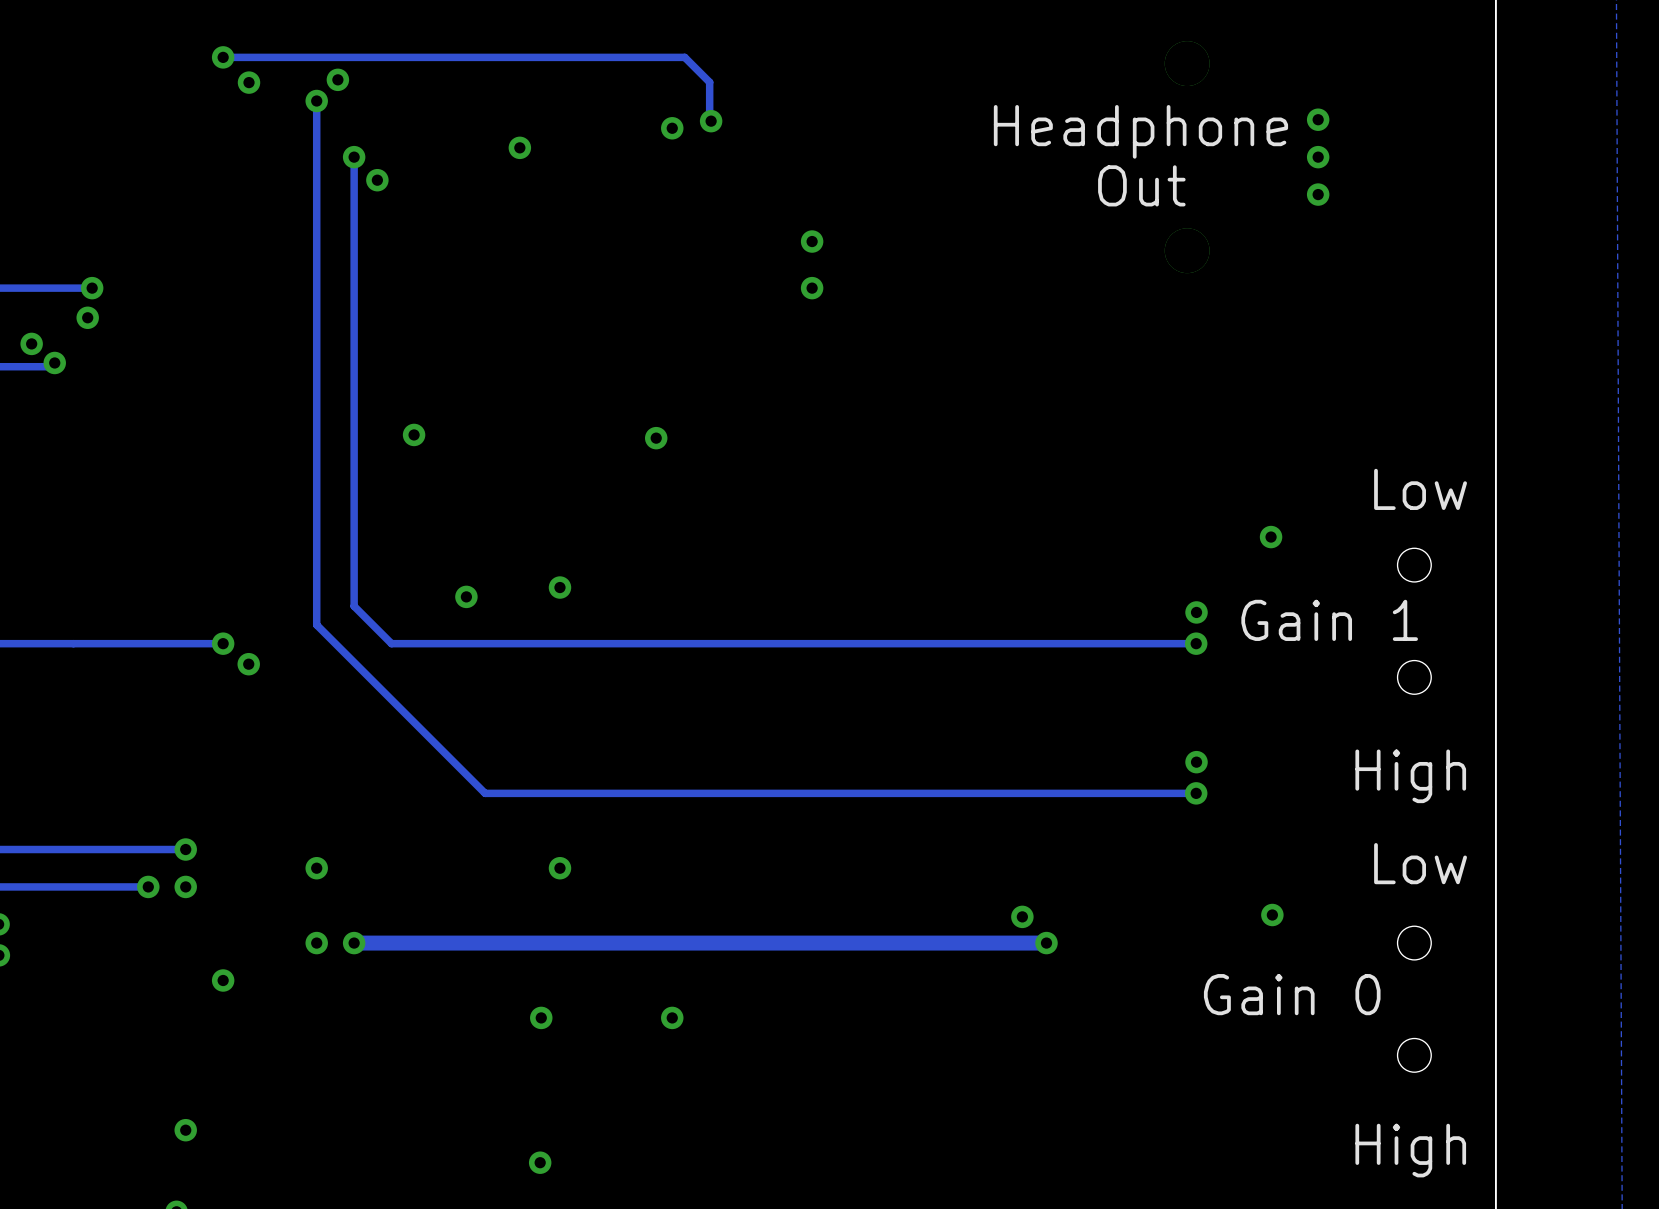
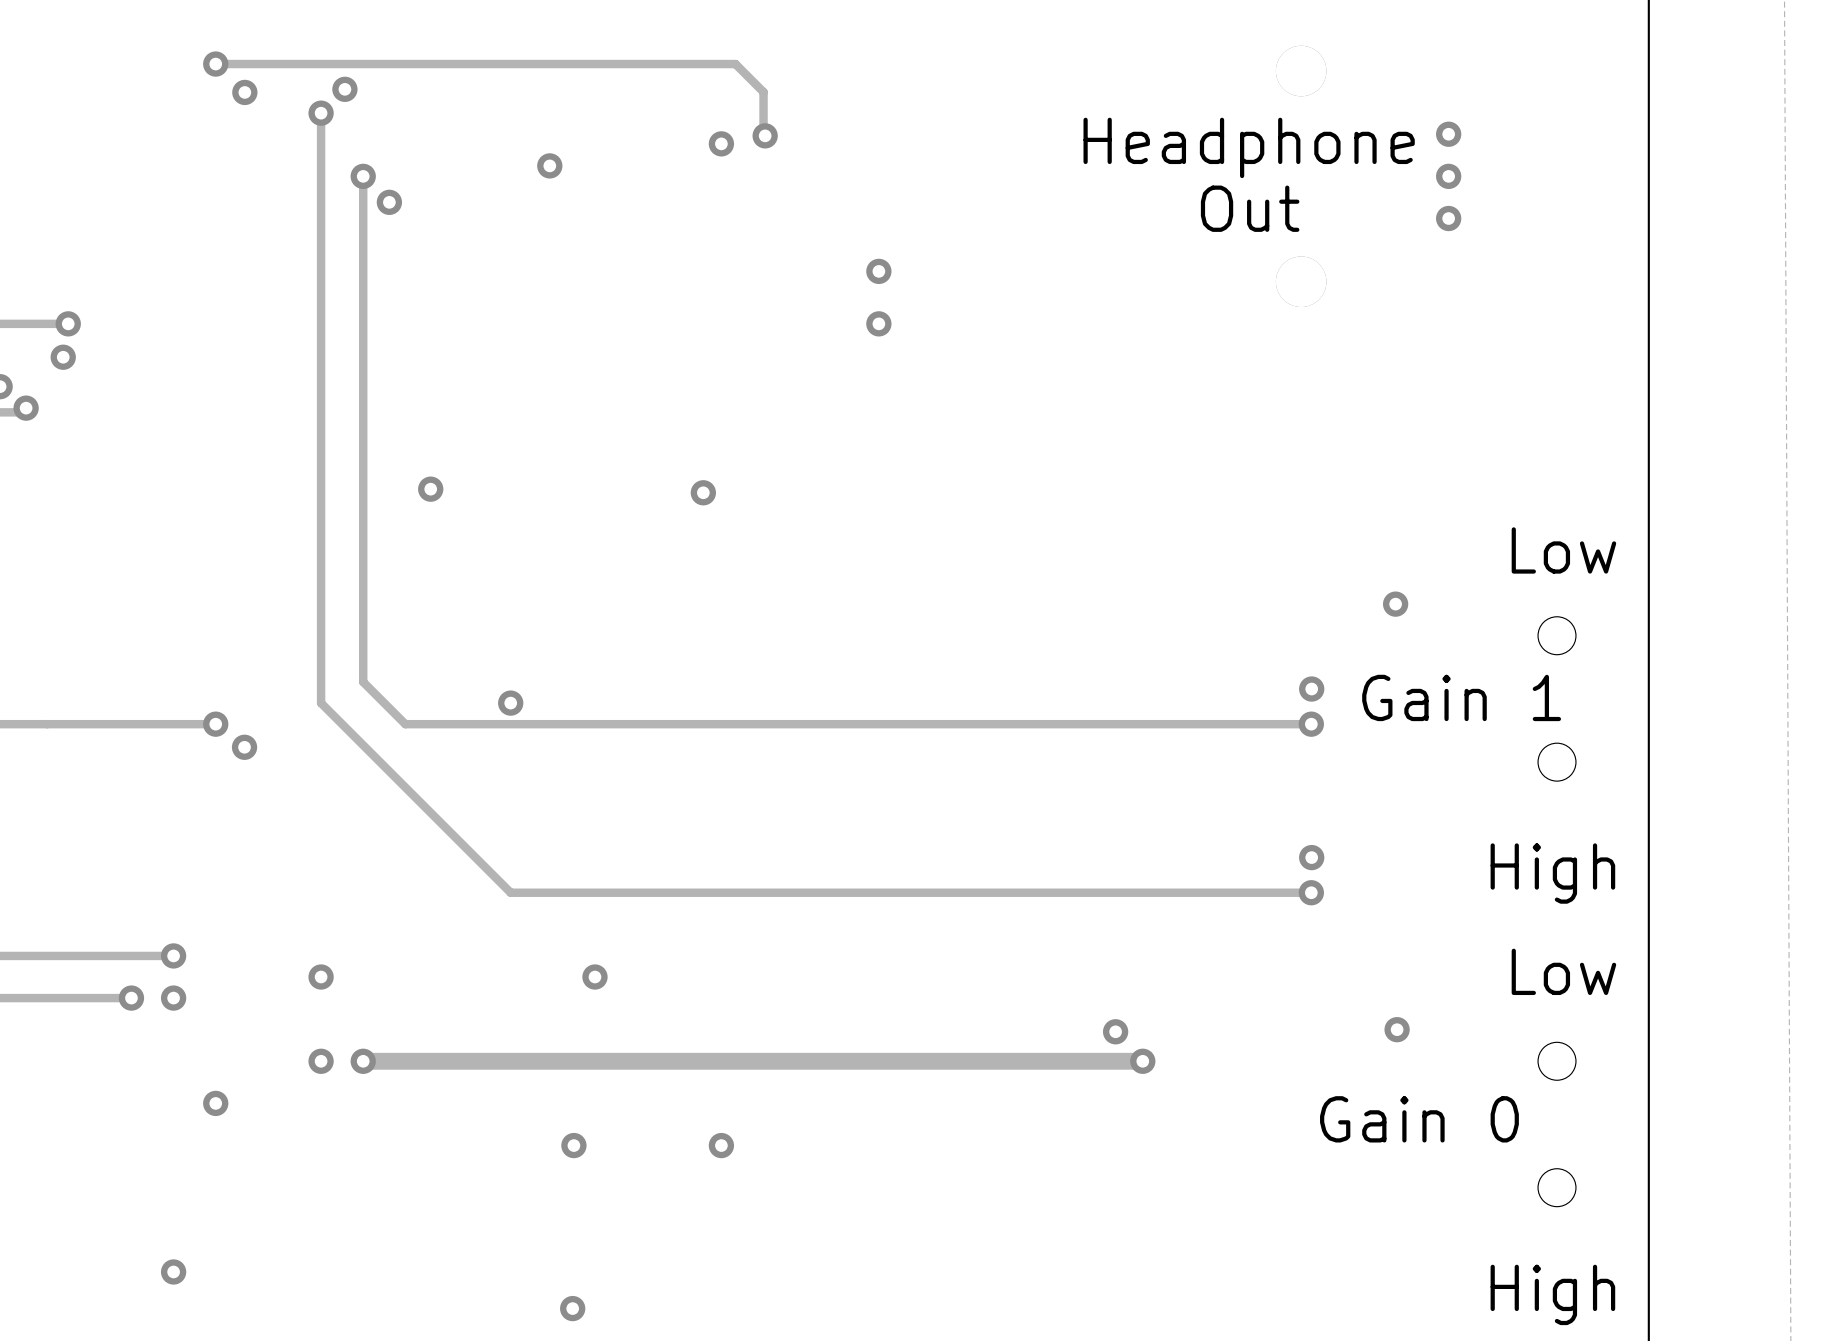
via: (559, 587) -> none
via position: (466, 596) -> (510, 703)

